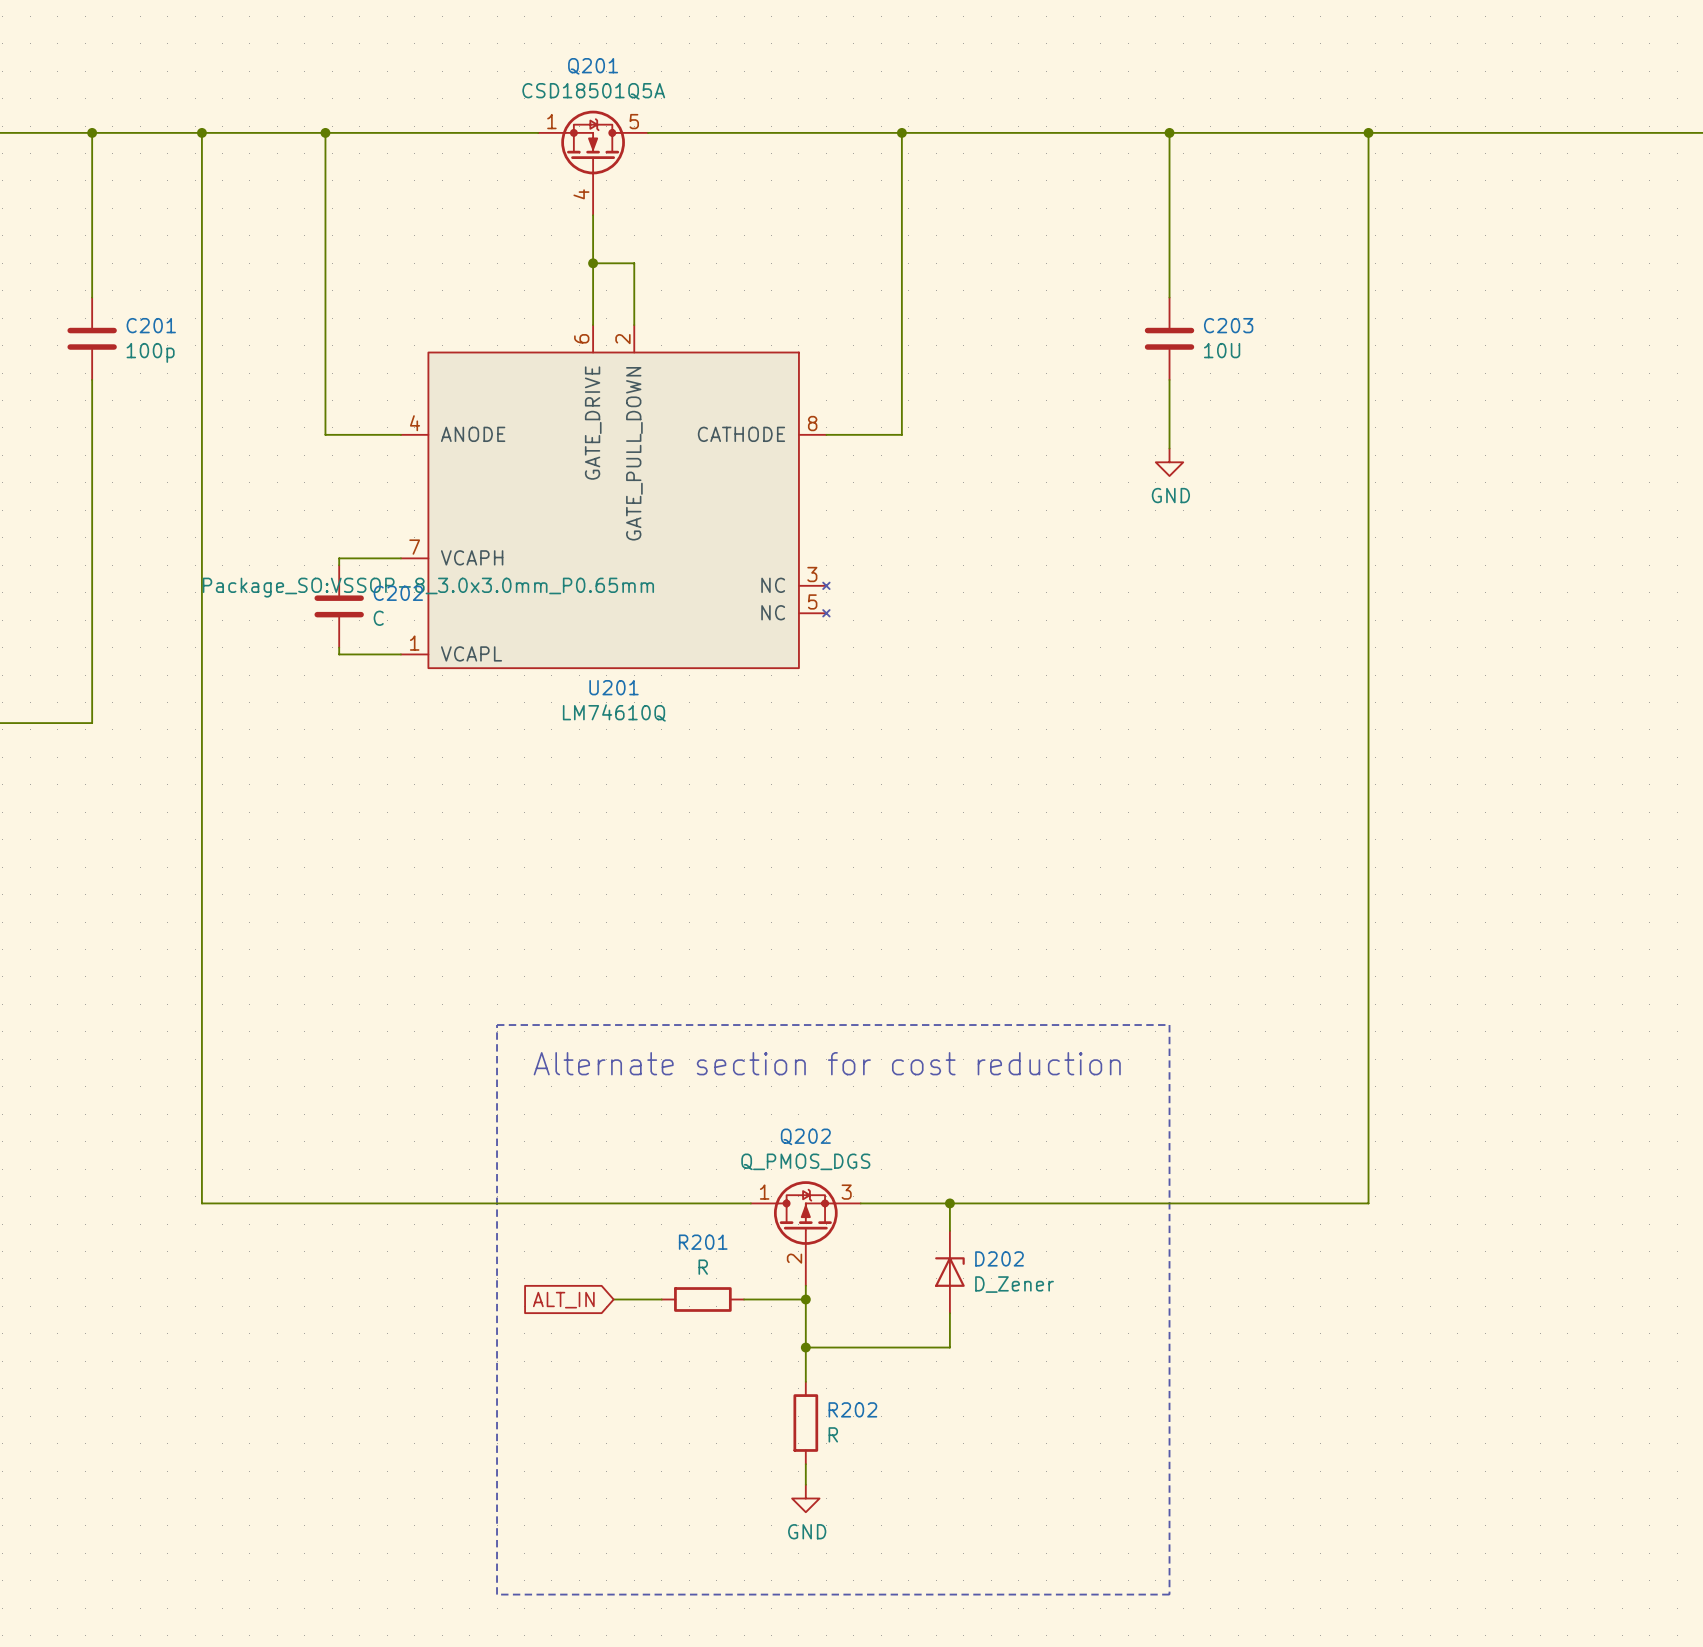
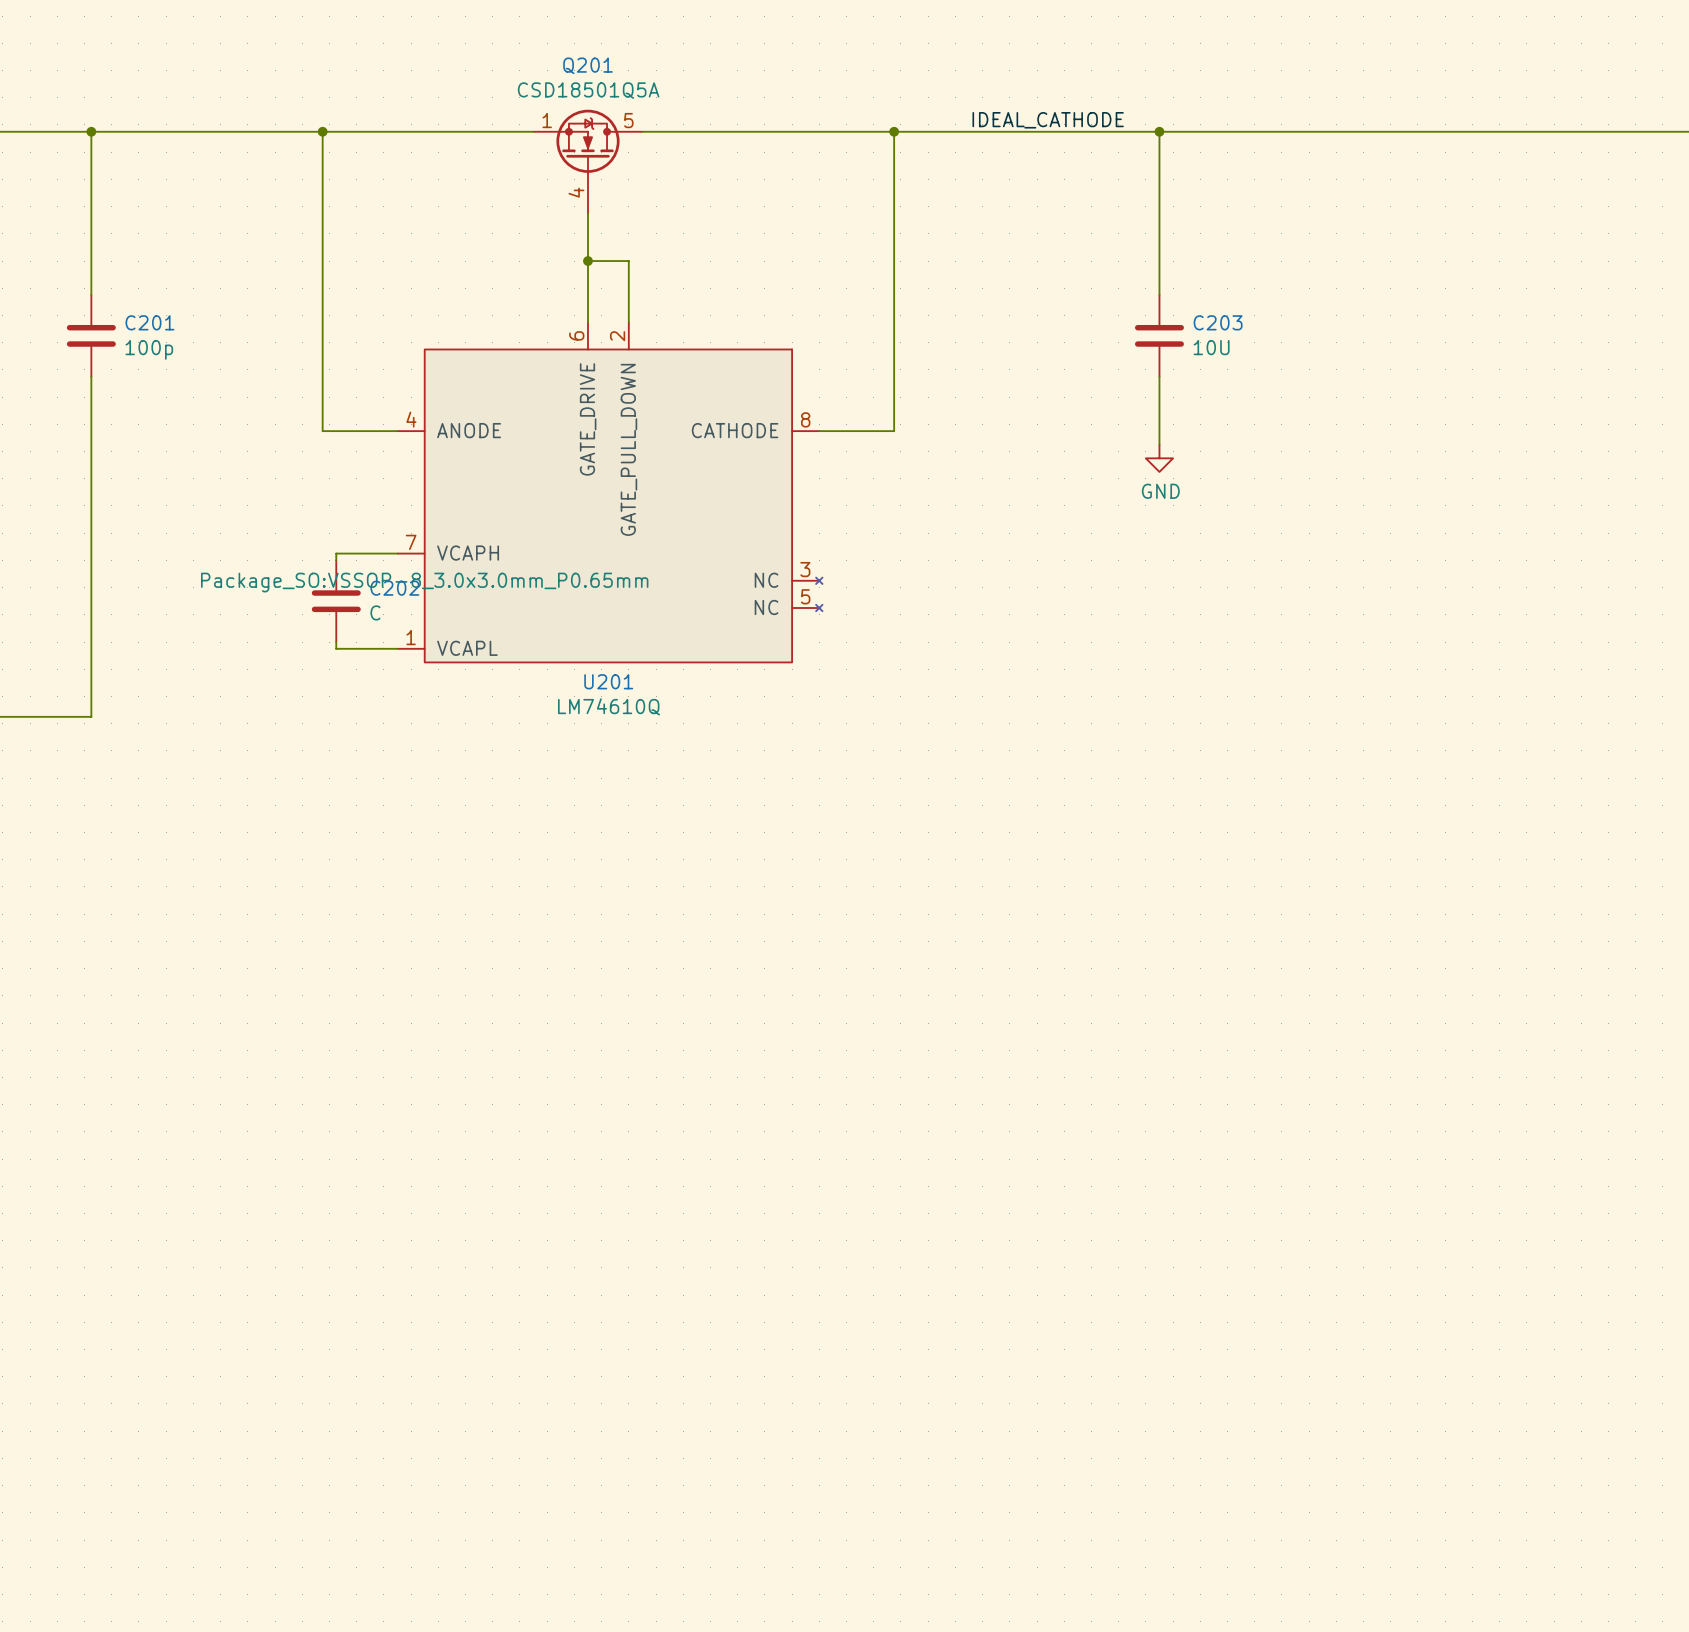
label: none -> IDEAL_CATHODE (1048, 120)
wire: (201, 132) (201, 1203) (750, 1203) -> none
junction: (201, 132) -> none
wire: (1368, 132) (1368, 1203) (860, 1203) -> none
junction: (1368, 132) -> none
line: (497, 1025) (1169, 1025) (1169, 1594) (497, 1594) (497, 1025) -> none
text: Alternate section for cost reduction (827, 1063) -> none
wire: (949, 1203) (949, 1230) -> none
junction: (949, 1203) -> none
Q202: Q_PMOS_DGS (805, 1233) -> none
D202: D_Zener (949, 1272) -> none
wire: (805, 1285) (805, 1381) -> none
wire: (613, 1299) (661, 1299) -> none
R201: R (702, 1299) -> none
wire: (744, 1299) (805, 1299) -> none
junction: (805, 1299) -> none
global label: ALT_IN (563, 1300) -> none
wire: (949, 1313) (949, 1347) (805, 1347) -> none
junction: (805, 1347) -> none
R202: R (805, 1423) -> none
wire: (805, 1464) (805, 1484) -> none
power symbol: GND (805, 1498) -> none

